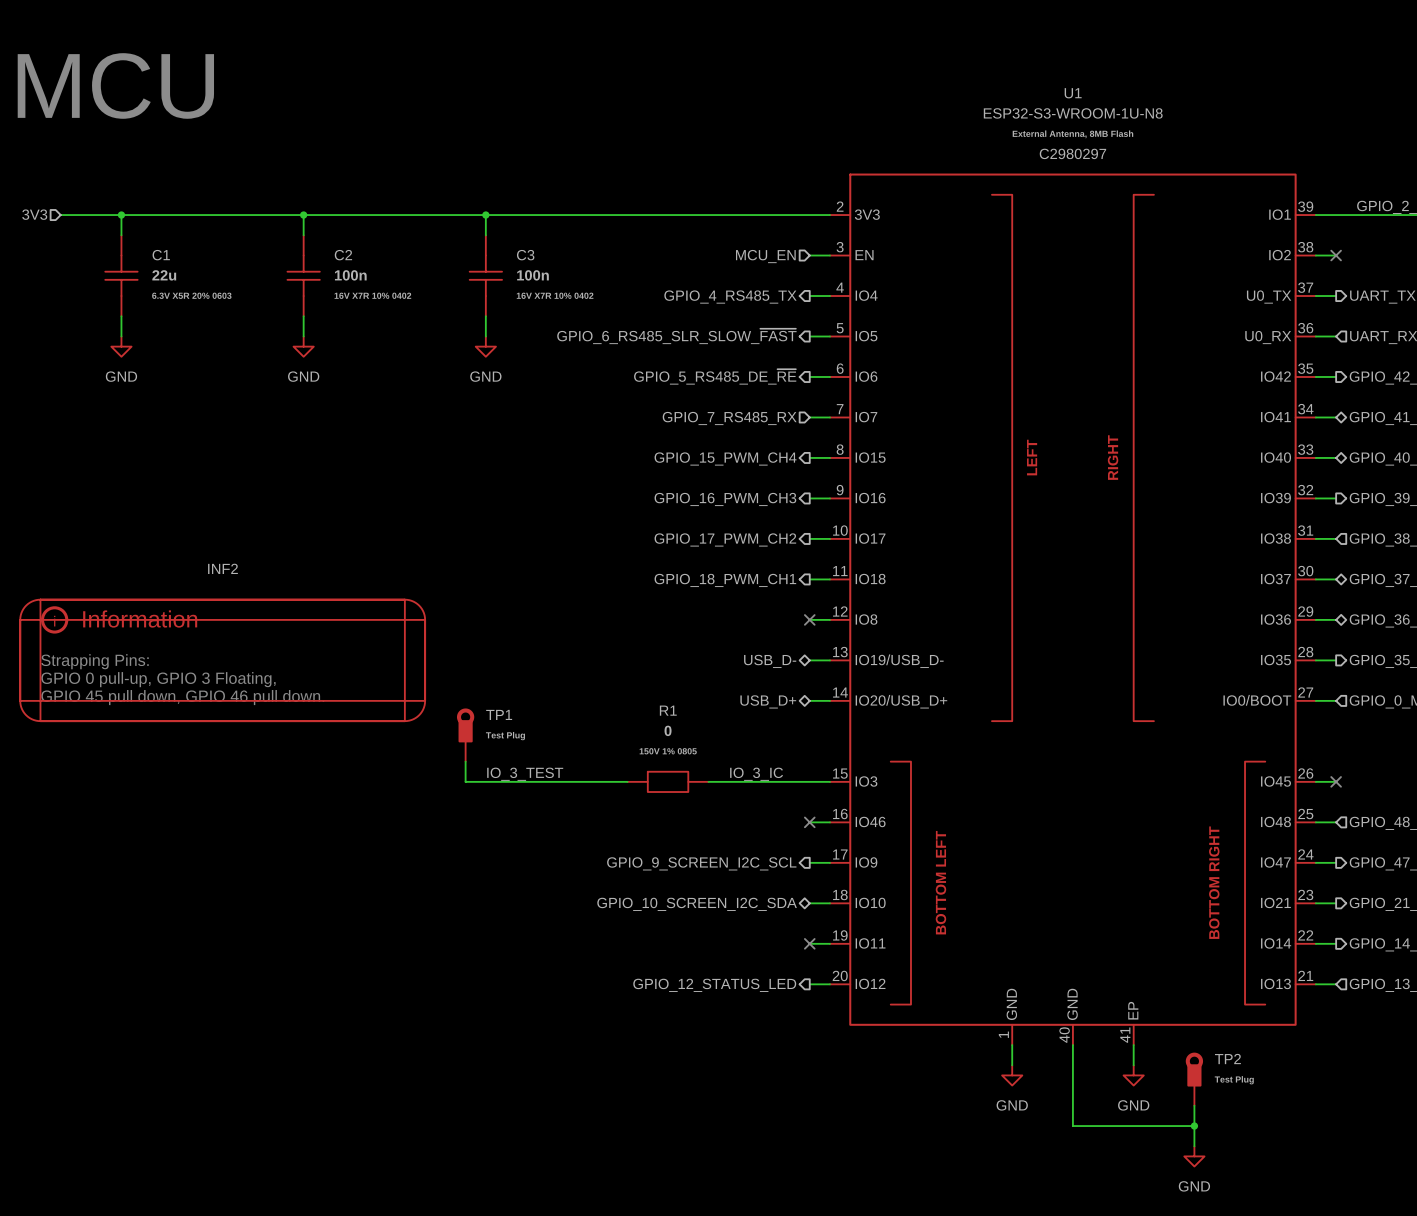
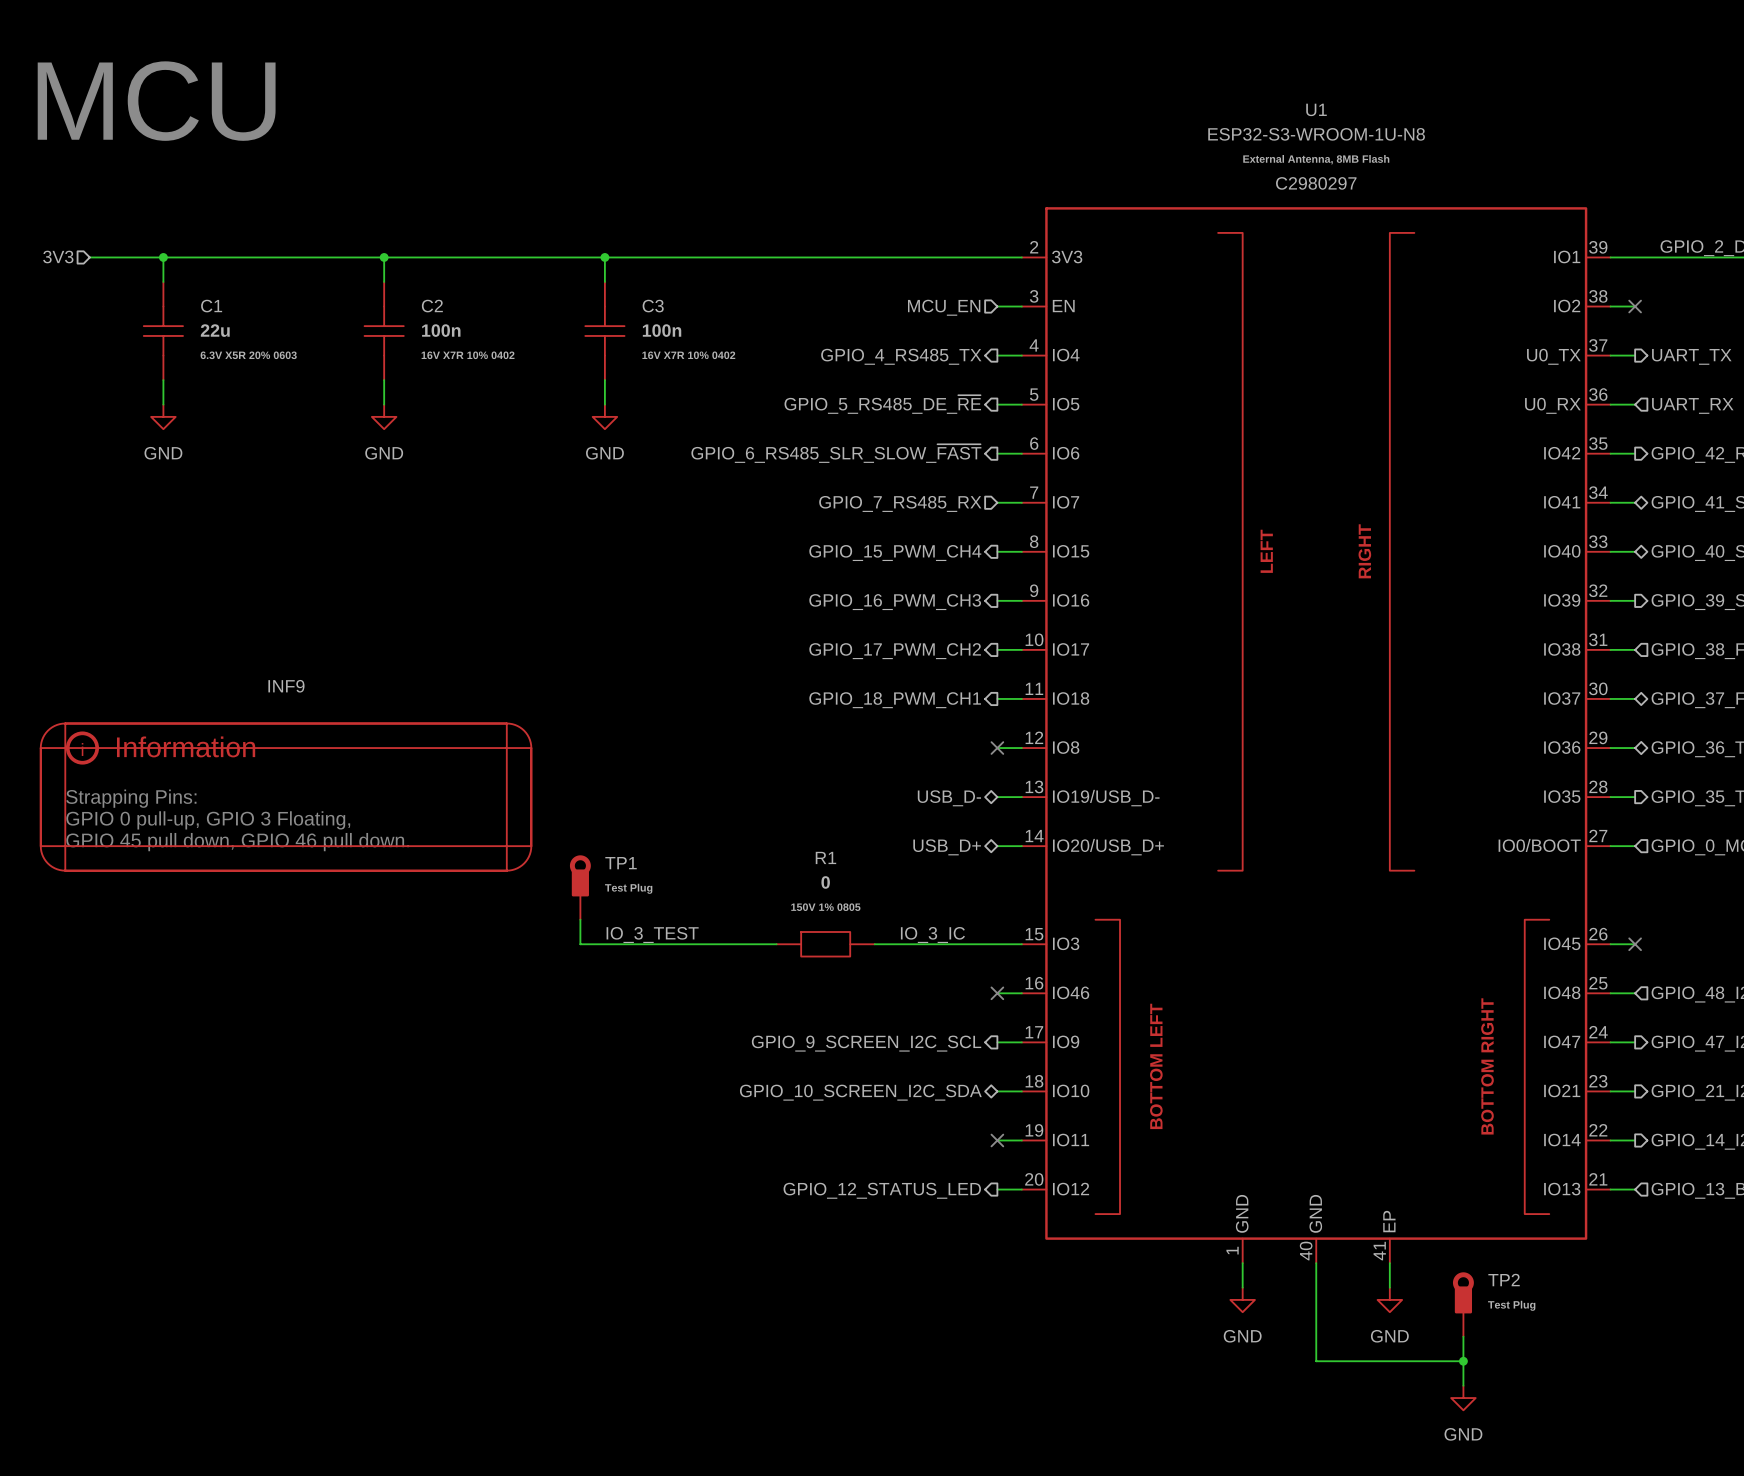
hierarchical label: GPIO_6_RS485_SLR_SLOW_~{FAST} (676, 336) -> GPIO_5_RS485_DE_~{RE} (882, 404)
hierarchical label: GPIO_5_RS485_DE_~{RE} (715, 376) -> GPIO_6_RS485_SLR_SLOW_~{FAST} (836, 453)
INF2 name: INF2 (222, 568) -> INF9 (286, 686)

